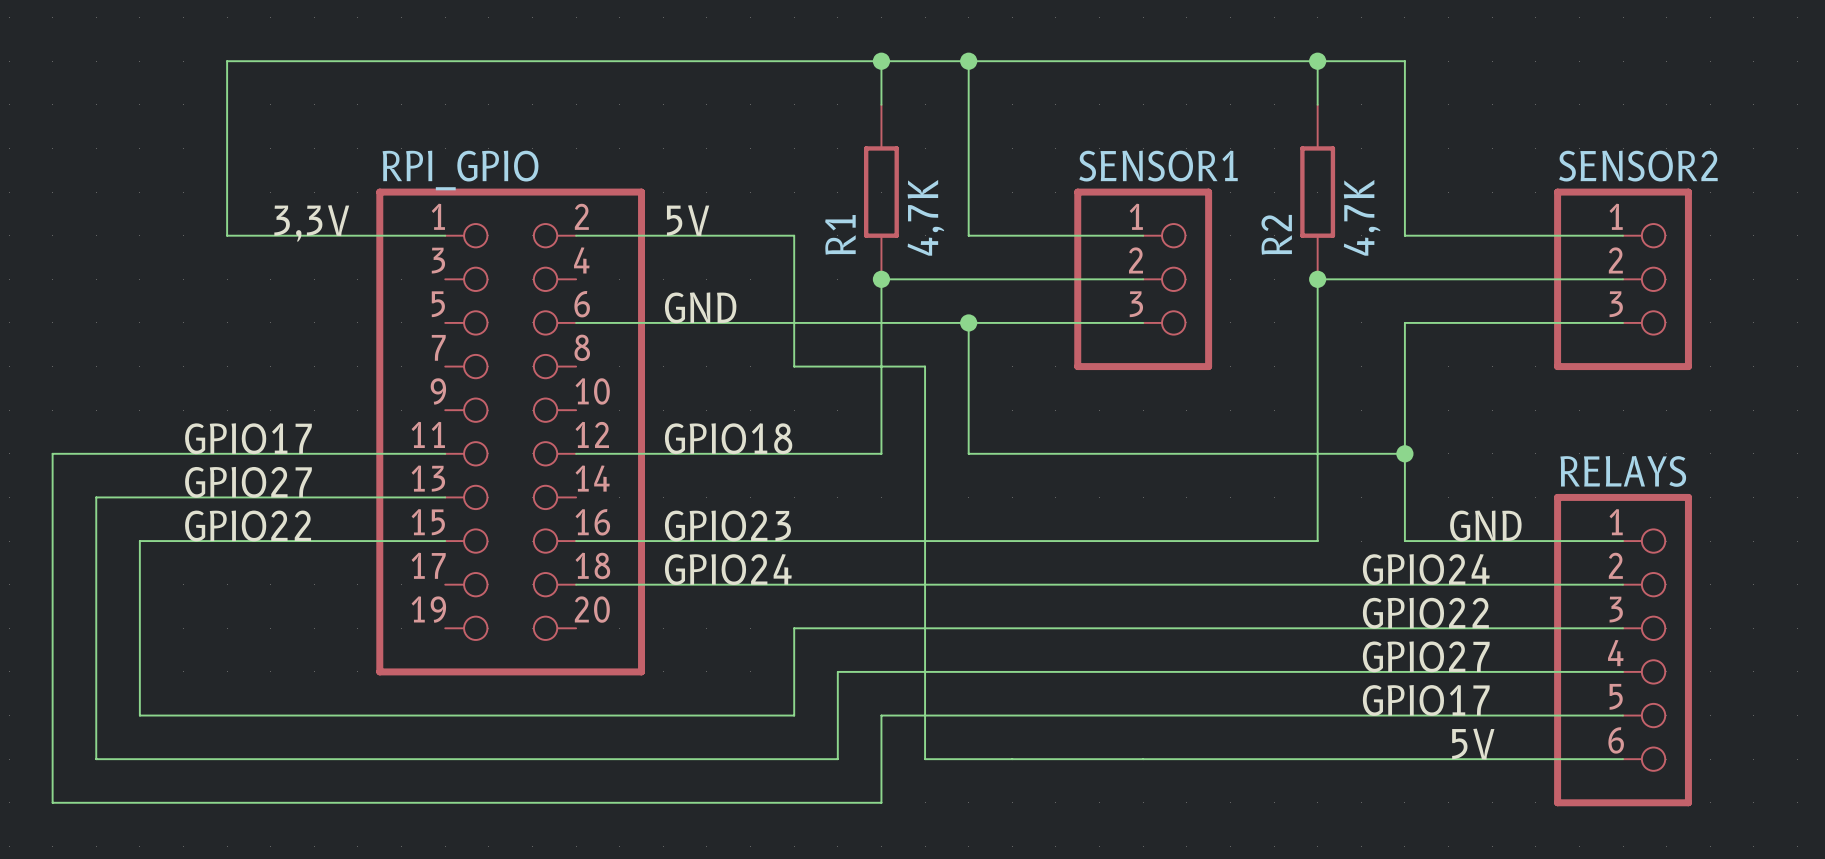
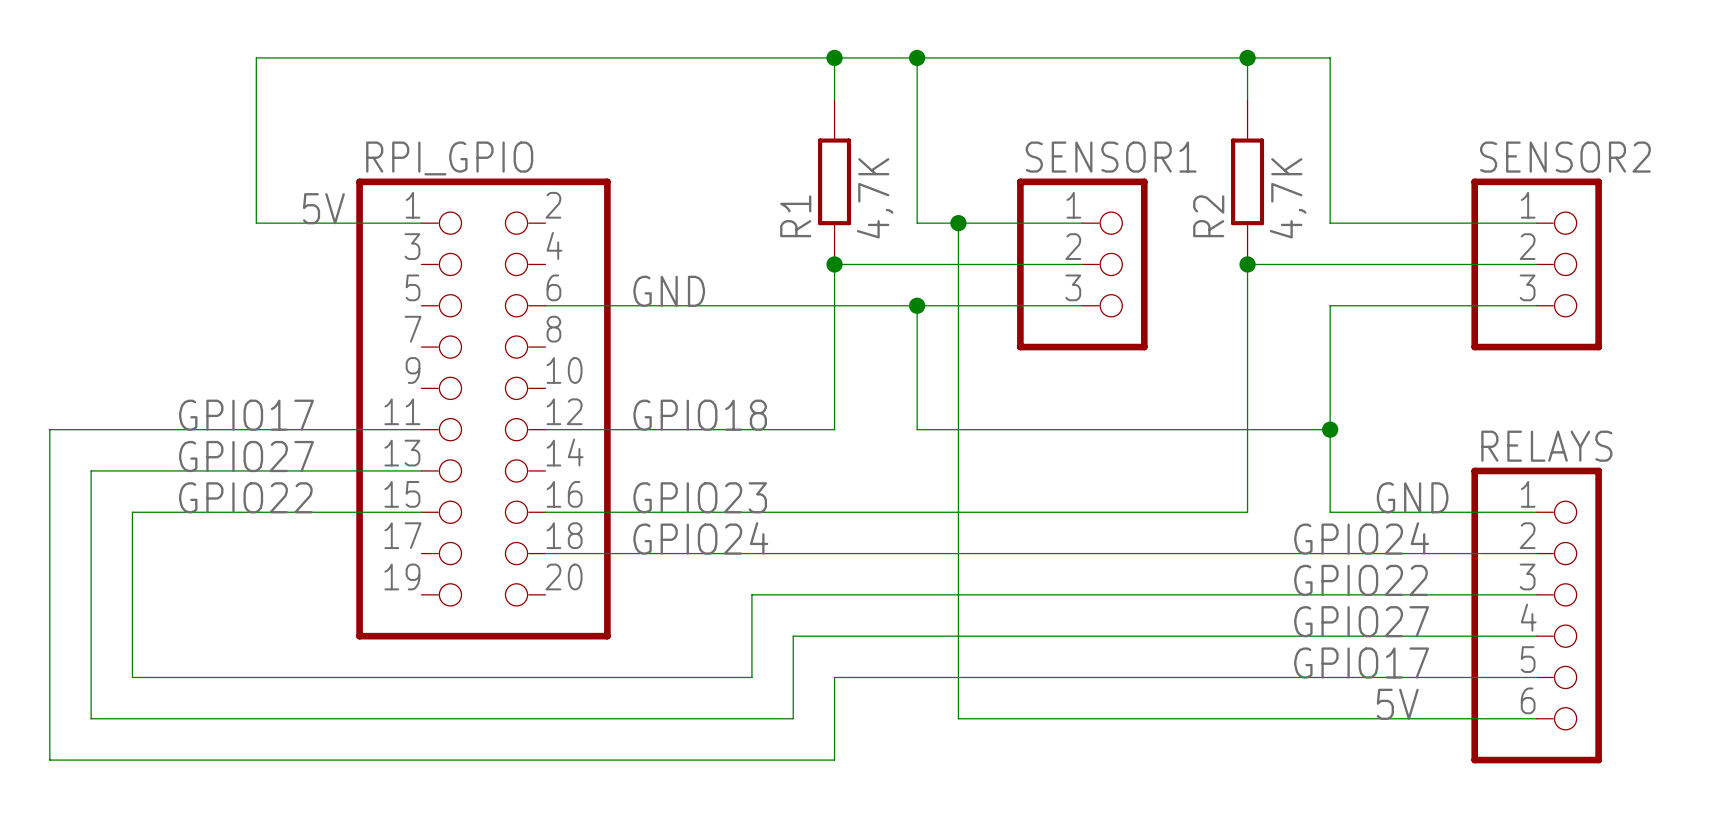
wire: (270, 61) (227, 61) (227, 235) (270, 235) -> (256, 57) (256, 223)
label position: 5V (688, 220) -> 5V (323, 208)
label: 3,3V (311, 223) -> none
wire: (576, 235) (794, 235) (794, 366) (925, 366) (925, 759) (1012, 759) -> (958, 223) (958, 718)
junction: none -> (958, 223)

